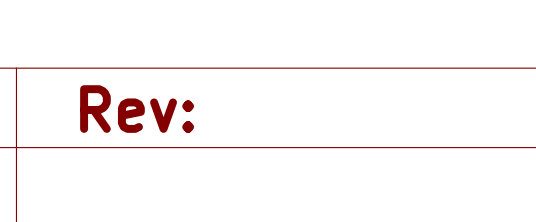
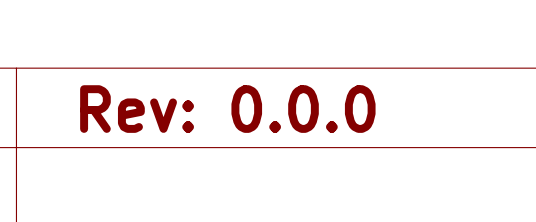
title block: Rev: (137, 109) -> Rev: 0.0.0 (227, 109)

